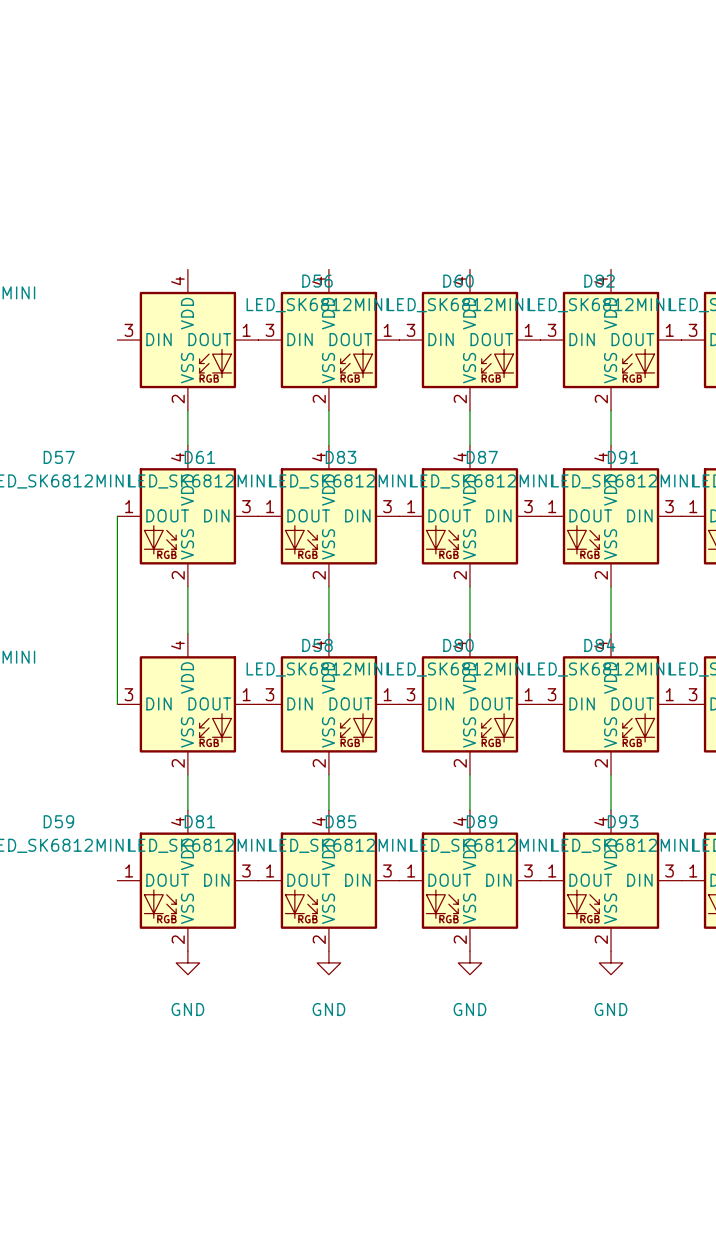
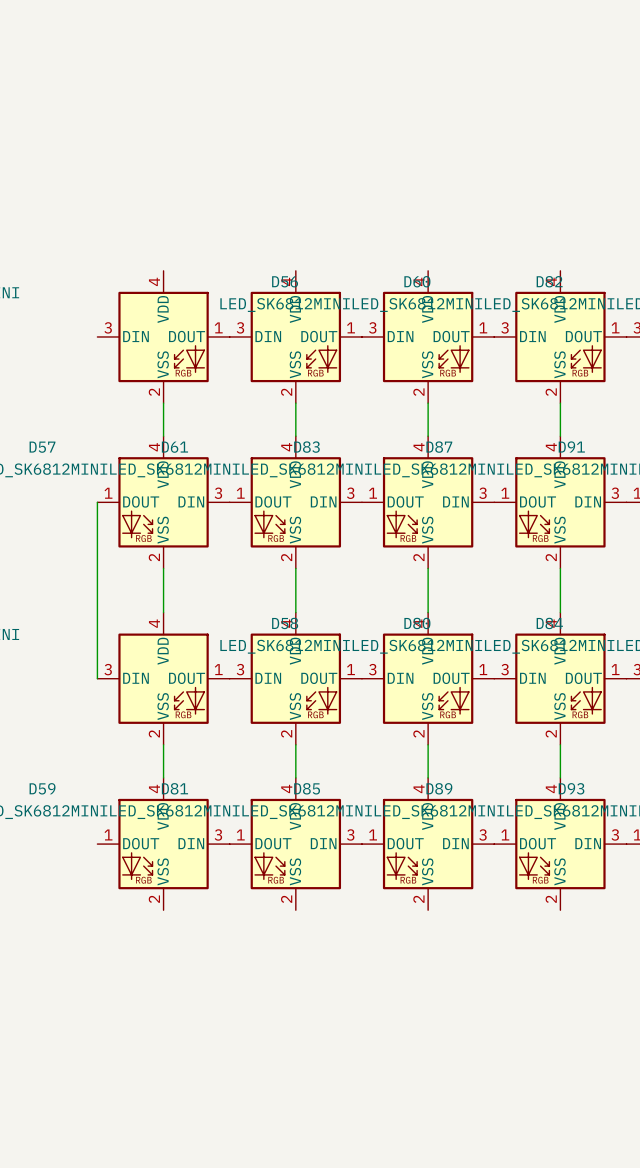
power symbol: GND (187, 962) -> none
power symbol: GND (328, 962) -> none
power symbol: GND (469, 962) -> none
power symbol: GND (611, 962) -> none

